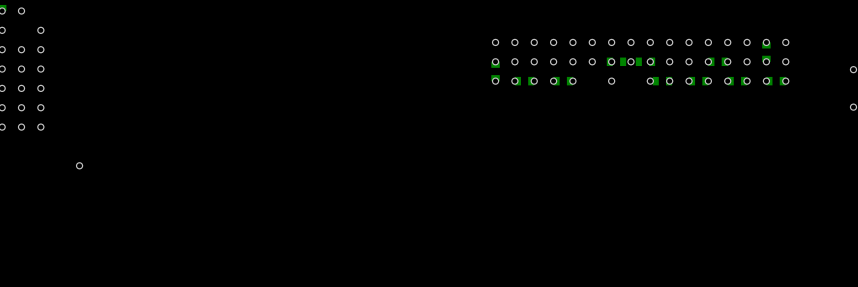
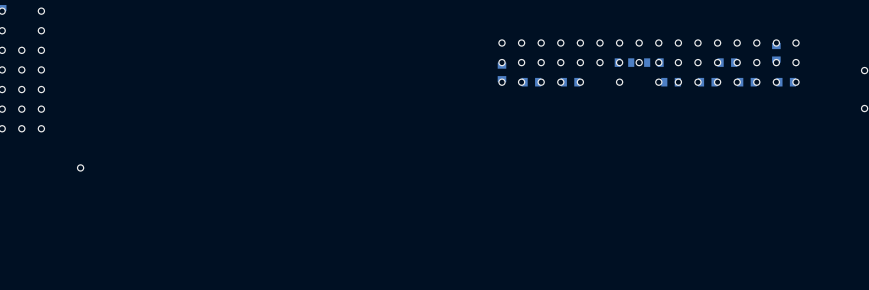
via: (21, 11) -> none
via: none -> (41, 11)

